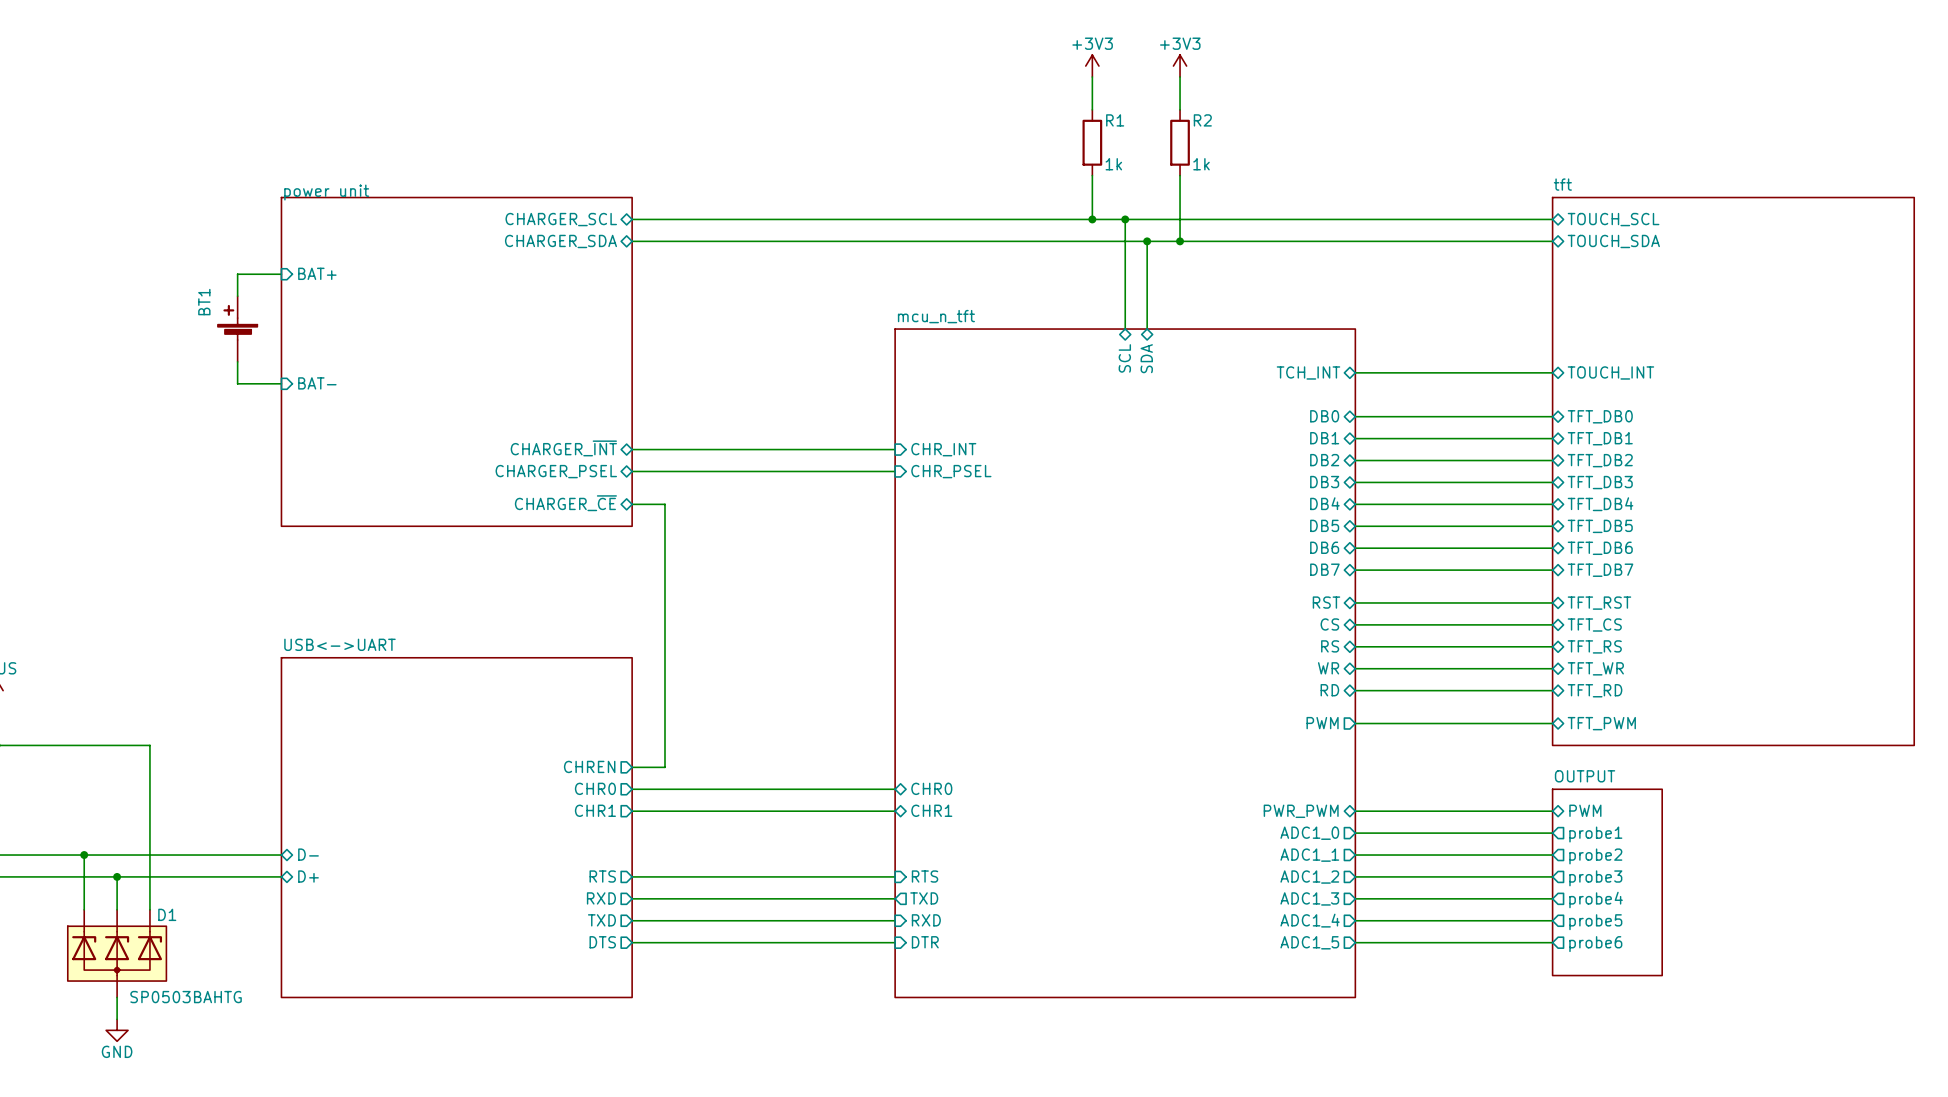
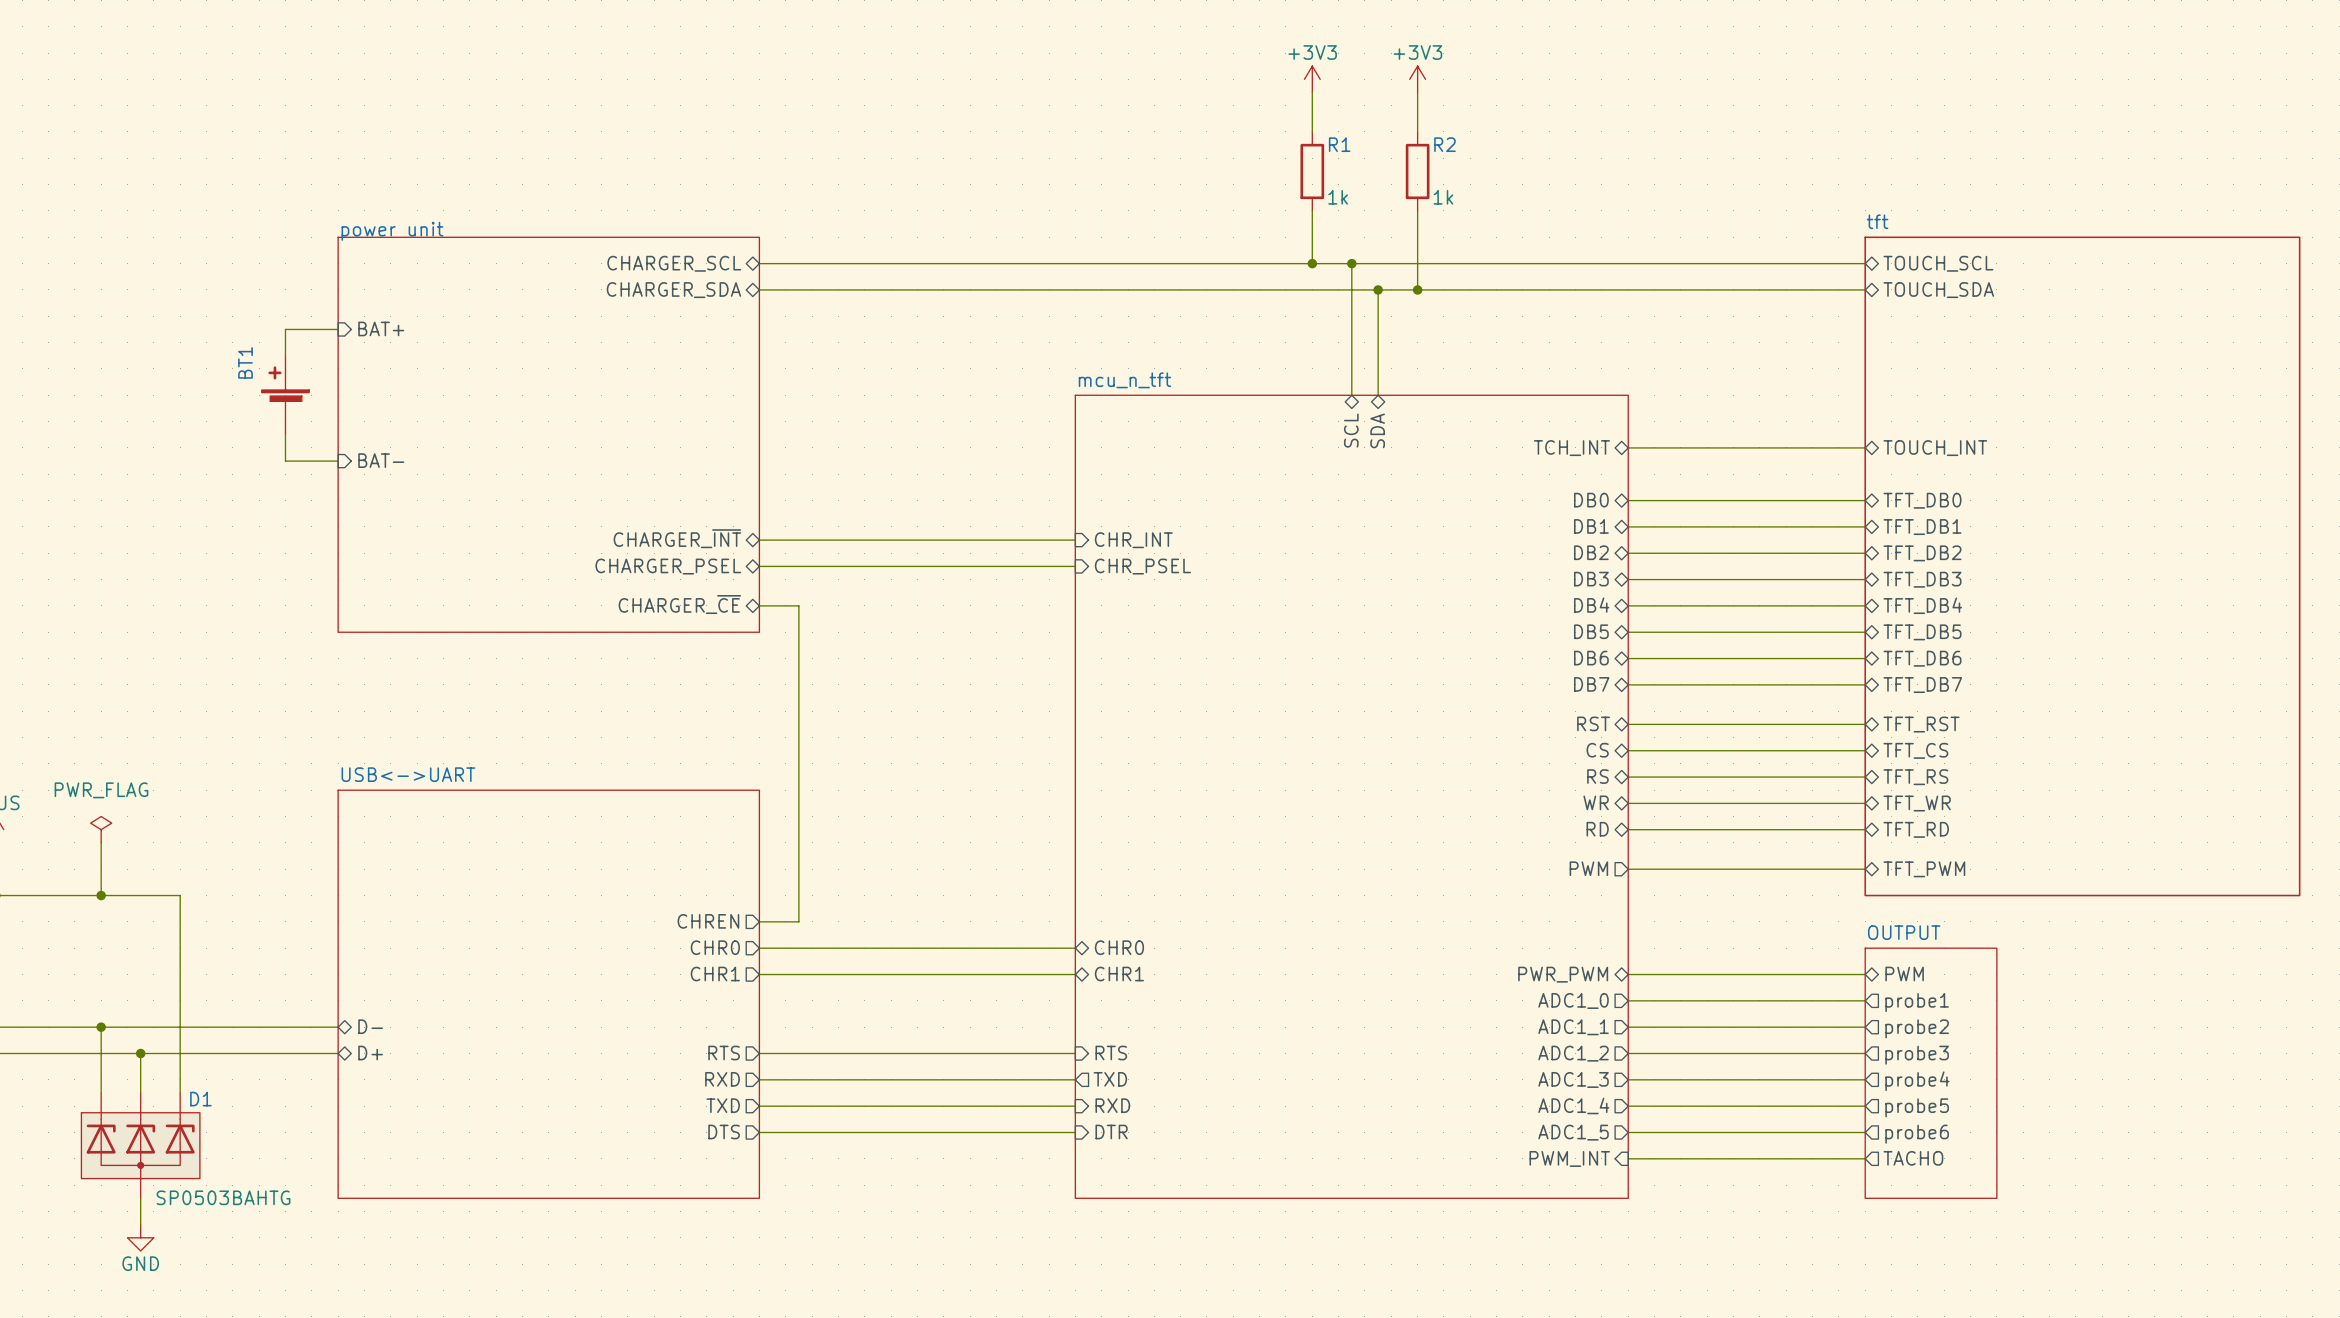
power symbol: none -> PWR_FLAG (101, 829)
wire: none -> (101, 842) (101, 895)
junction: none -> (101, 895)
sheet OUTPUT: (1607, 882) -> none
sheet OUTPUT: none -> (1931, 1073)
sheet pin: none -> PWM_INT (1569, 1158)
wire: none -> (1628, 1158) (1865, 1158)
sheet pin: none -> TACHO (1913, 1158)

